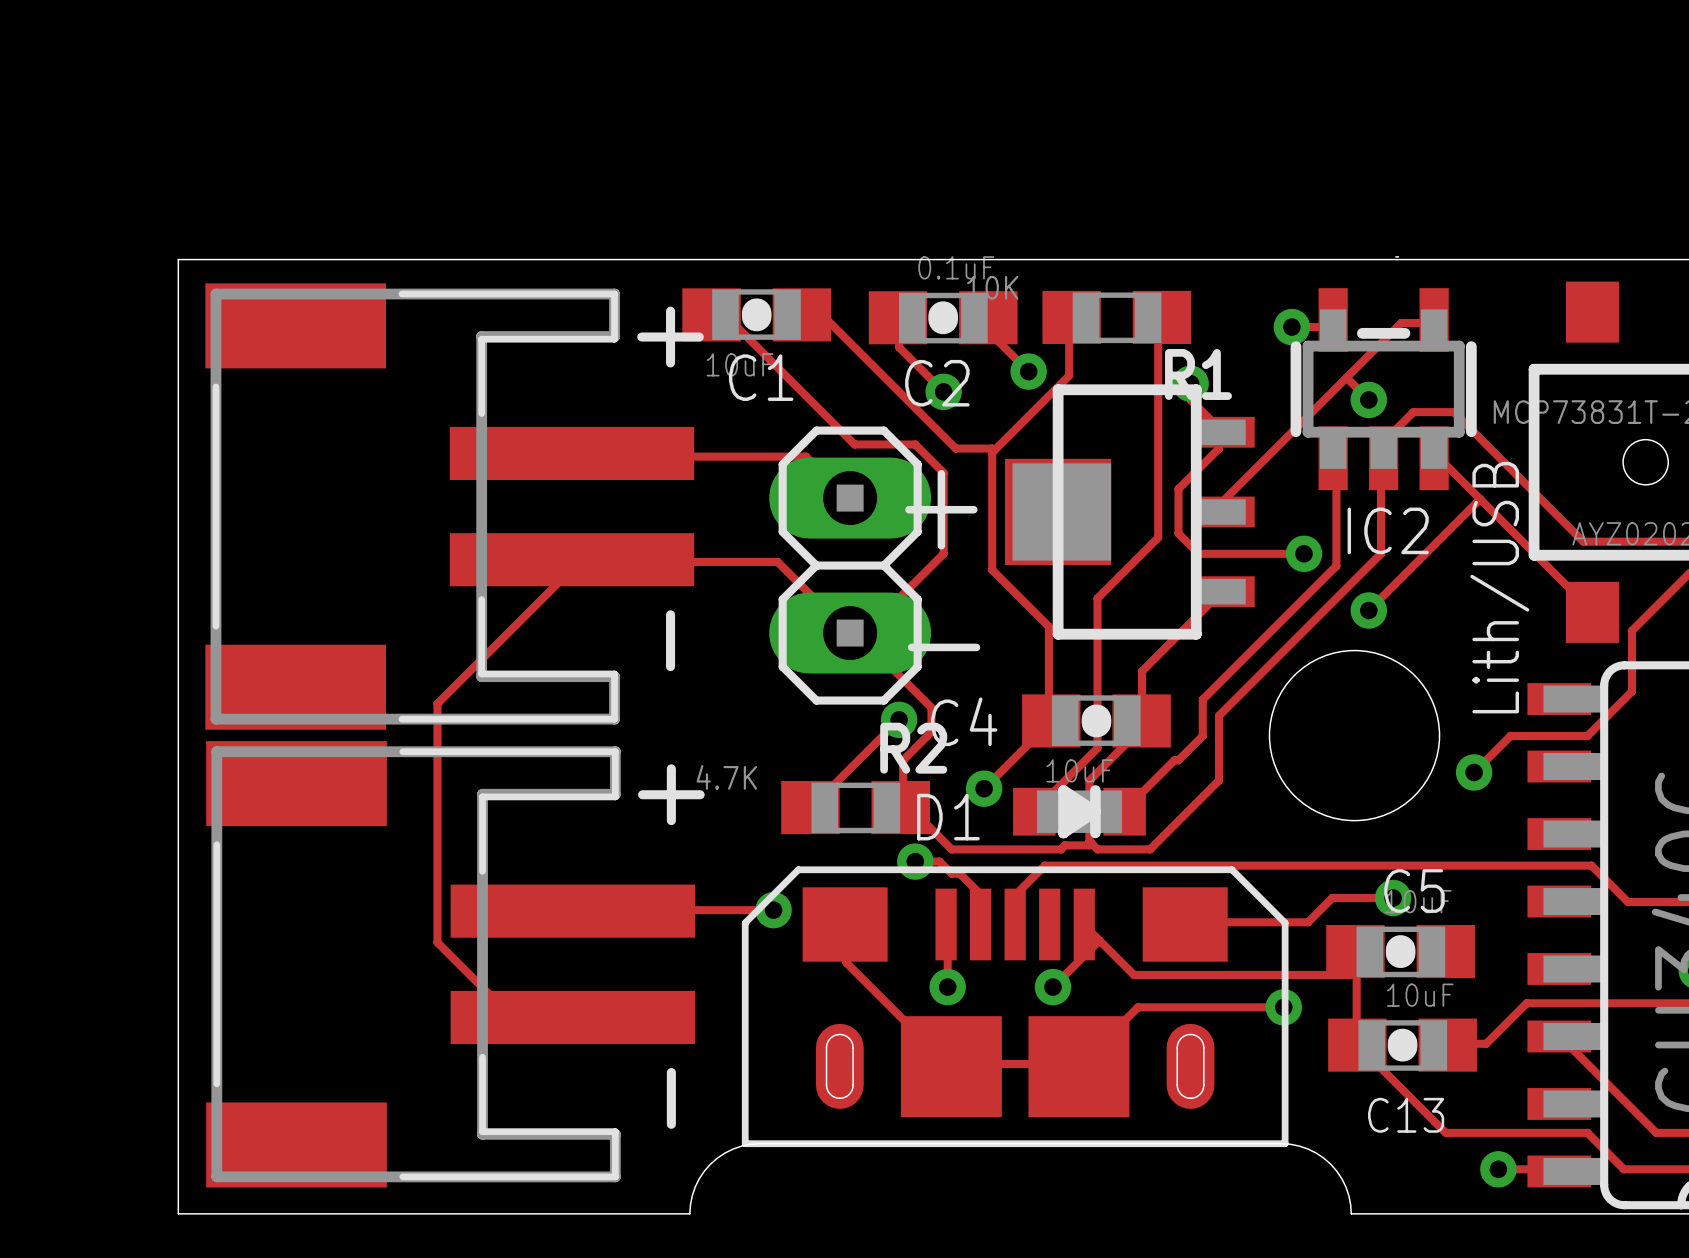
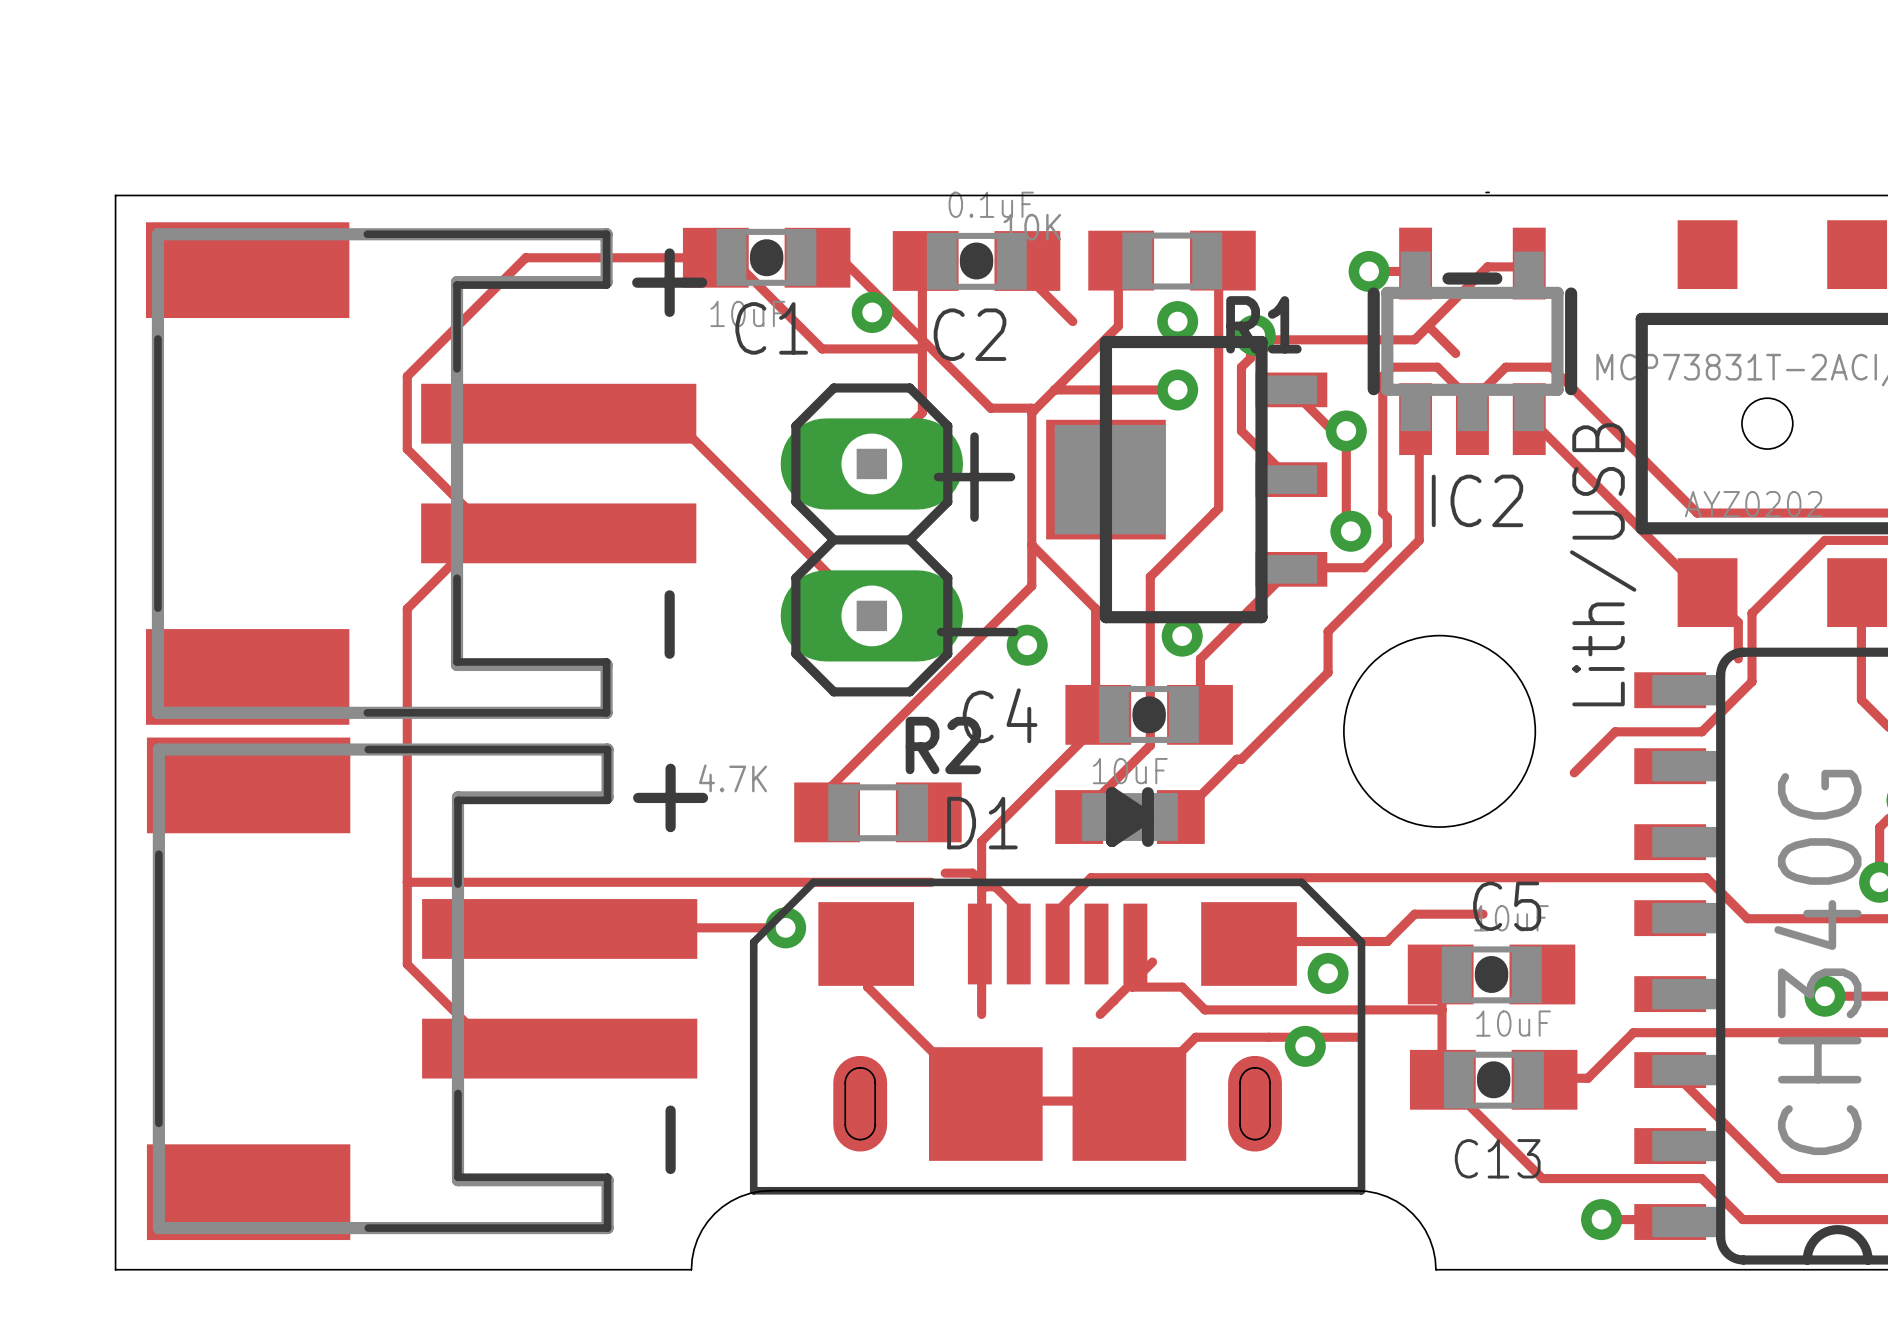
track: (897, 317) (899, 347) (943, 391) -> (925, 260) (922, 262) (922, 412) (872, 462)
track: (1401, 323) (1312, 412) -> (1478, 394) (1469, 394) (1472, 419) (1469, 417) (1469, 399) (1437, 367) (1391, 367)
track: none -> (1492, 266) (1487, 266) (1414, 339) (1250, 339) (1250, 358) (1241, 367) (1241, 430) (1291, 479)
via: none -> (872, 312)
via: (1028, 371) -> none
via: none -> (1177, 321)
track: (1190, 383) (1190, 399) (1222, 432) (1218, 432) (1218, 448) (1178, 489) (1178, 533) (1198, 553) (1304, 553) -> none
via: (943, 391) -> none
track: (805, 395) (854, 444) (915, 444) (943, 472) (943, 553) (862, 634) (850, 633) (850, 634) (858, 634) (931, 707) (931, 731) (903, 760) (903, 804) (900, 807) (907, 804) (951, 849) (1061, 849) (1065, 845) (1089, 845) (1091, 843) -> (822, 348) (922, 348)
via: (1368, 399) -> none
track: (1304, 420) (1223, 501) (1222, 511) -> (1382, 376) (1382, 513) (1387, 517) (1387, 544) (1364, 567) (1291, 567) (1291, 569)
track: none -> (1054, 389) (1177, 389)
via: none -> (1177, 389)
track: none -> (1291, 389) (1332, 430) (1346, 430) (1346, 526) (1350, 531)
track: (1389, 436) (1385, 440) (1385, 456) (1380, 460) (1380, 553) (1218, 715) (1218, 780) (1150, 849) (1097, 849) (1089, 841) (1089, 780) (1138, 731) (1138, 723) (1141, 720) -> none
track: (672, 456) (805, 456) (846, 497) (850, 498) -> (671, 417) (790, 535)
track: (1434, 458) (1437, 456) (1592, 612) -> (1529, 419) (1706, 595) (1707, 592) (1710, 595) (1738, 622) (1738, 658)
via: none -> (1346, 430)
track: (1480, 499) (1368, 610) -> none
via position: (1304, 553) -> (1350, 531)
track: (777, 561) (575, 561) (572, 559) (575, 565) (437, 703) -> (715, 257) (525, 257) (407, 376) (407, 449) (489, 531) (557, 531) (558, 533) (484, 531) (407, 608) (407, 695)
via: (1368, 610) -> none
track: (1255, 646) (1202, 699) (1202, 736) -> (1328, 631) (1328, 672) (1268, 731)
via: none -> (1182, 636)
via: none -> (1027, 645)
track: (899, 719) (814, 804) -> (1031, 544) (1031, 585) (831, 786) (831, 809)
via: (899, 719) -> none
track: (1048, 723) (984, 788) -> (1095, 718) (1095, 727) (981, 841) (981, 941) (979, 944)
via: (1474, 772) -> none
via: (984, 788) -> none
via: (915, 861) -> none
track: none -> (407, 882) (931, 882)
via: (1393, 898) -> none
track: (1084, 924) (1133, 974) (1356, 974) (1355, 951) -> none
via: none -> (1328, 973)
track: none -> (1129, 984) (1132, 987) (1182, 987) (1205, 1009) (1442, 1009)
via: (947, 987) -> none
via: (1052, 987) -> none
via: (1283, 1007) -> none
via: none -> (1305, 1046)

